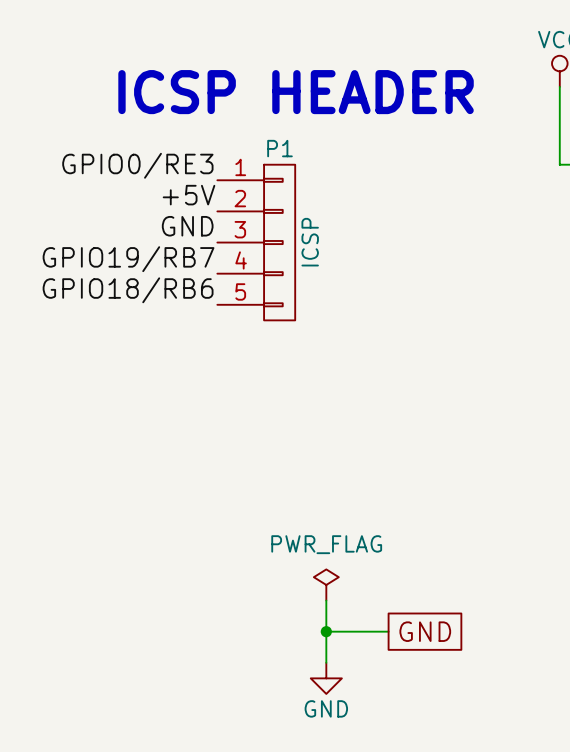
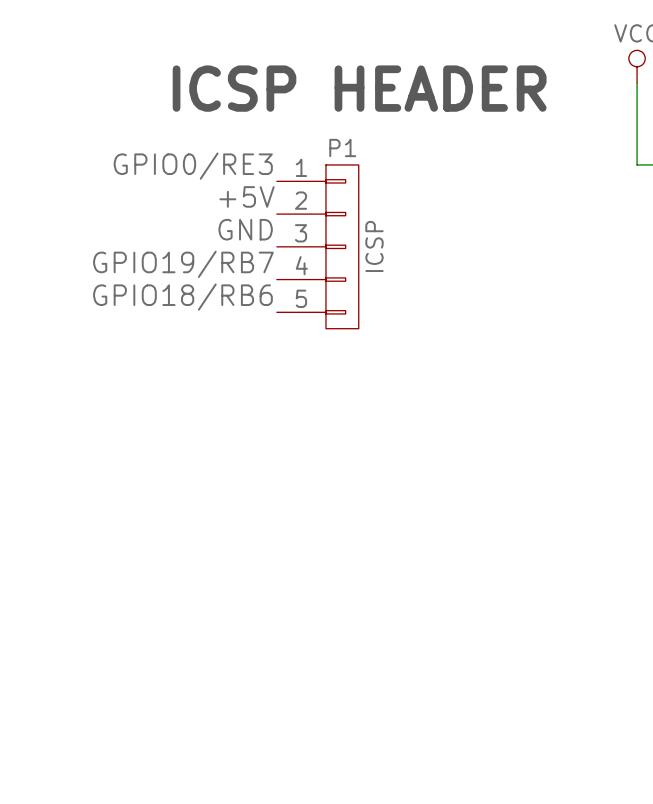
power symbol: PWR_FLAG (326, 584) -> none
wire: (326, 600) (326, 662) -> none
wire: (326, 631) (388, 631) -> none
junction: (326, 631) -> none
global label: GND (425, 631) -> none
power symbol: GND (326, 678) -> none

